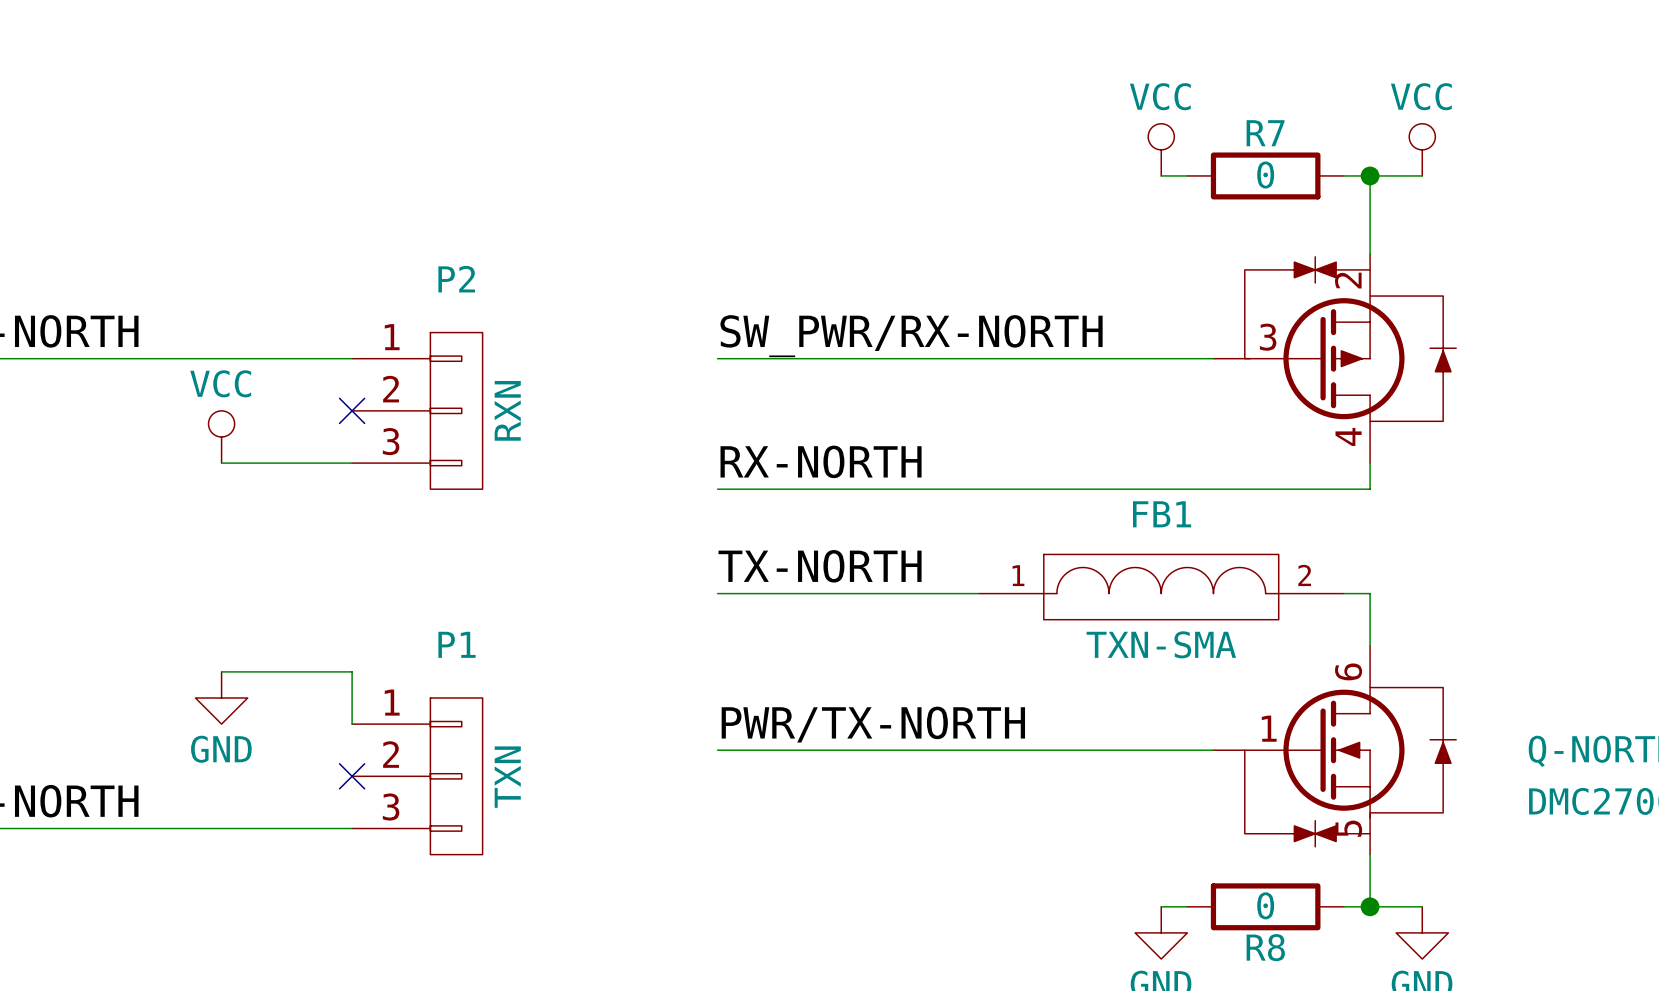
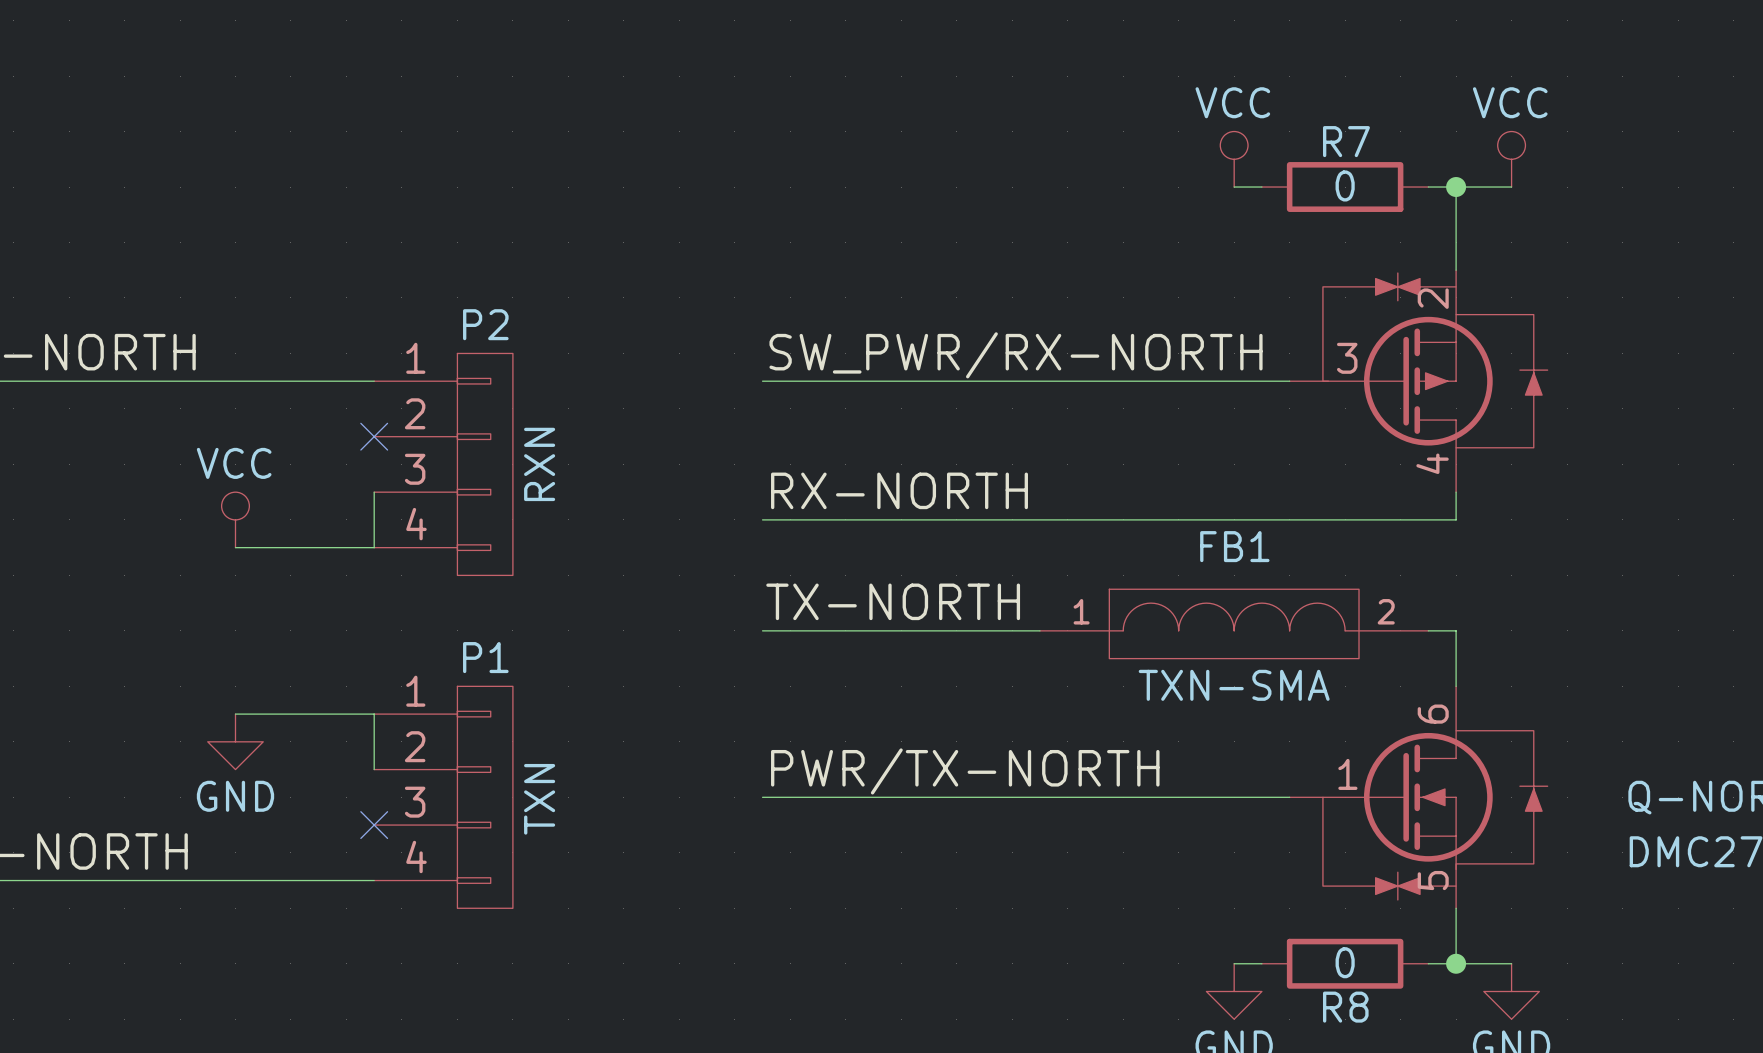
P2 symbol: [352, 332, 483, 490] -> [374, 353, 513, 576]
power symbol position: VCC (221, 436) -> VCC (235, 519)
wire: (221, 463) (352, 463) -> (235, 547) (374, 547) (374, 492)
P1 symbol: [352, 698, 483, 855] -> [374, 686, 513, 909]

